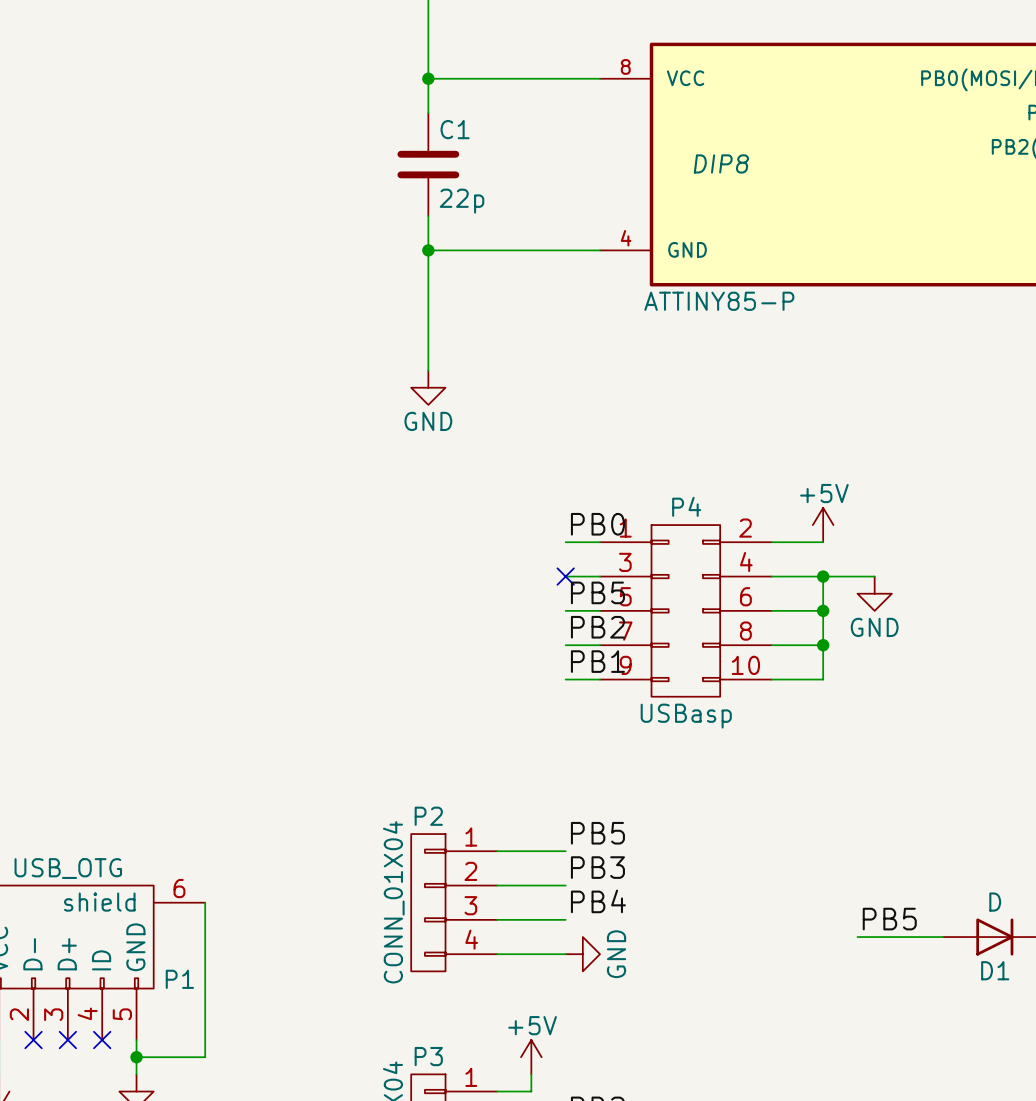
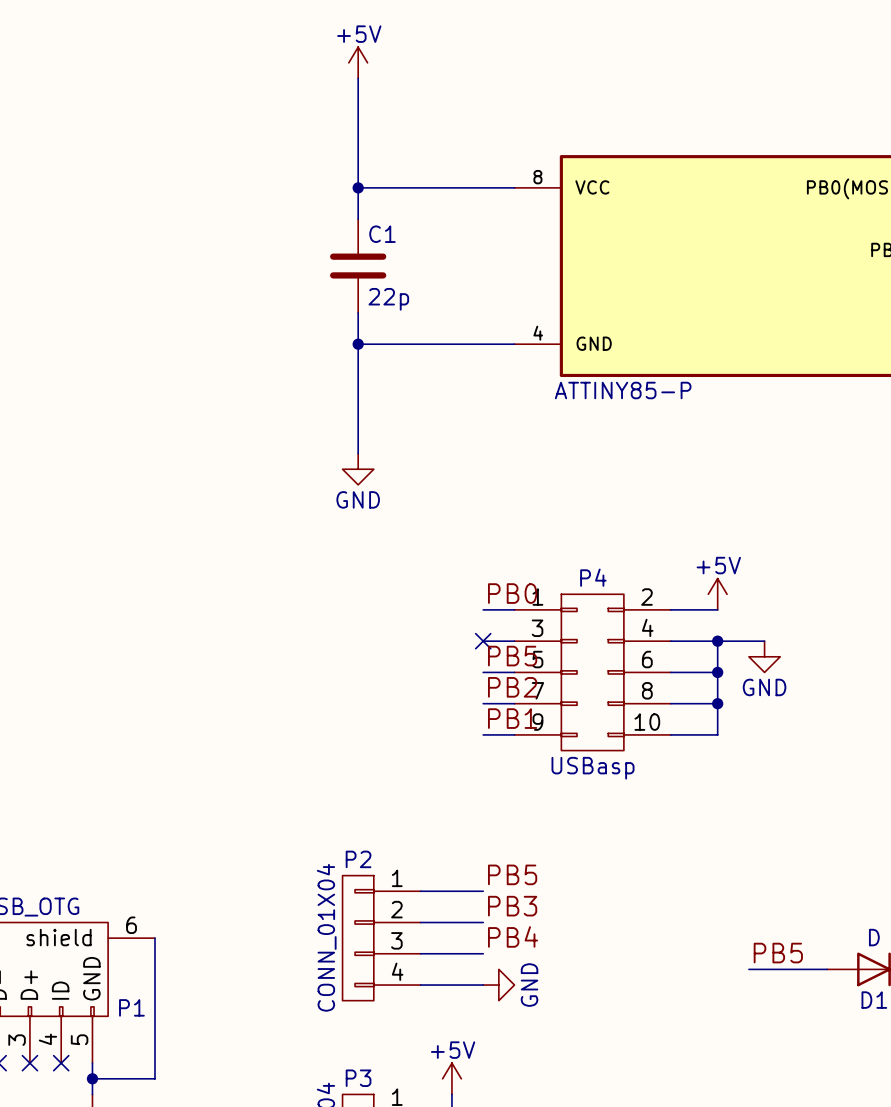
part text: DIP8 (721, 163) -> none

